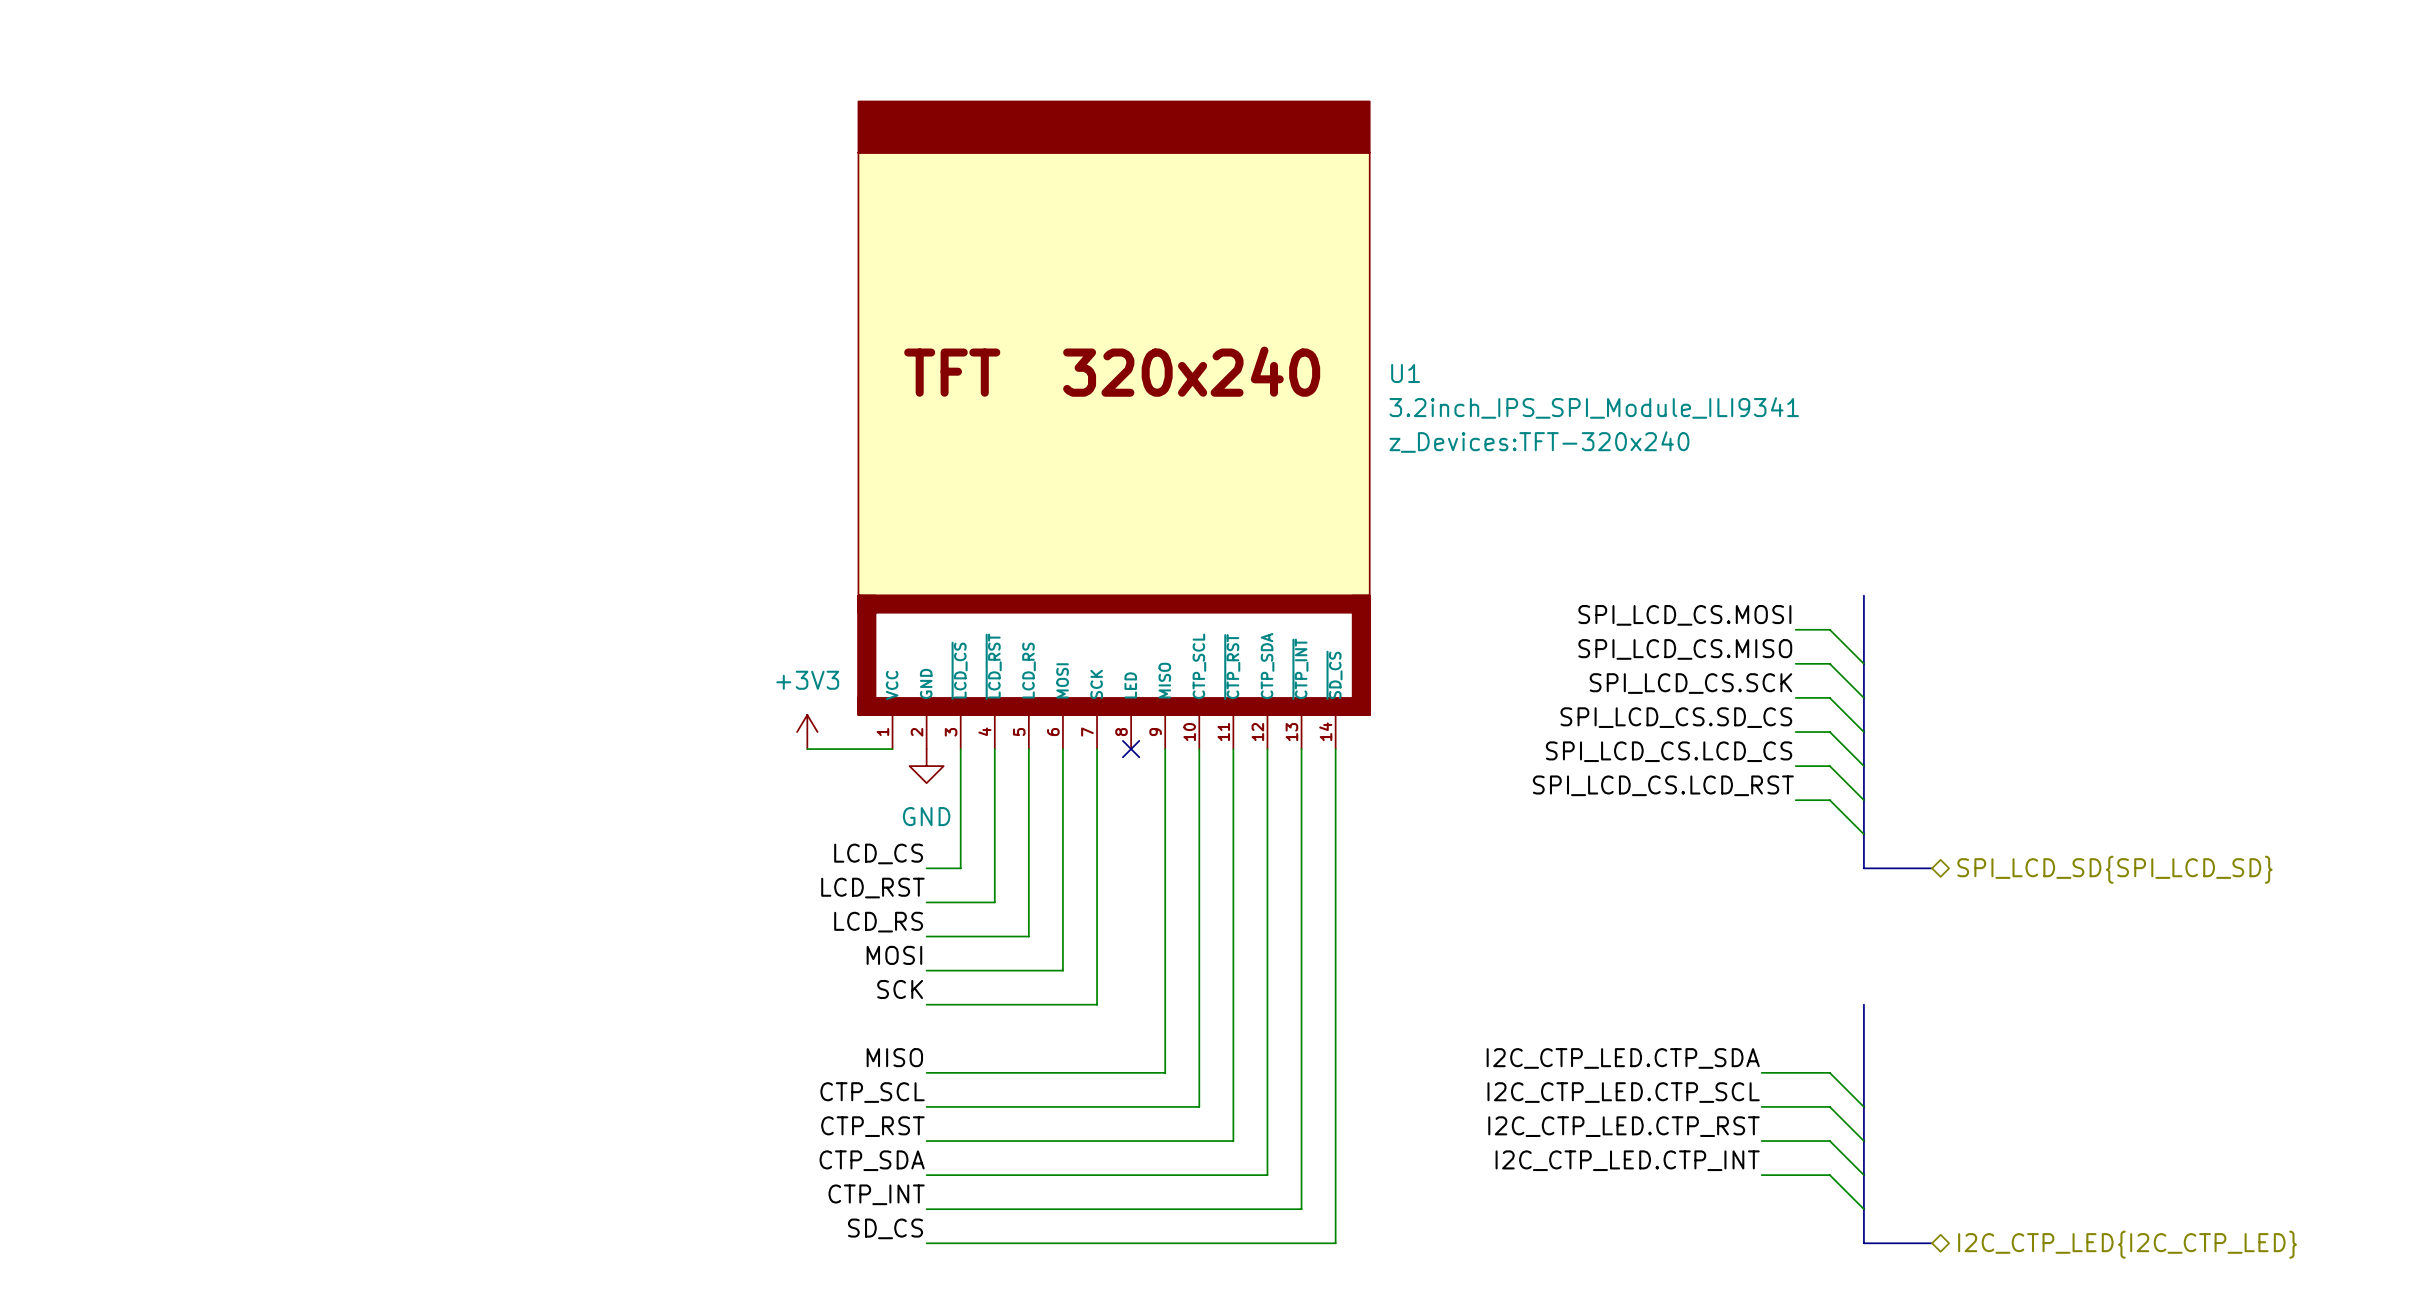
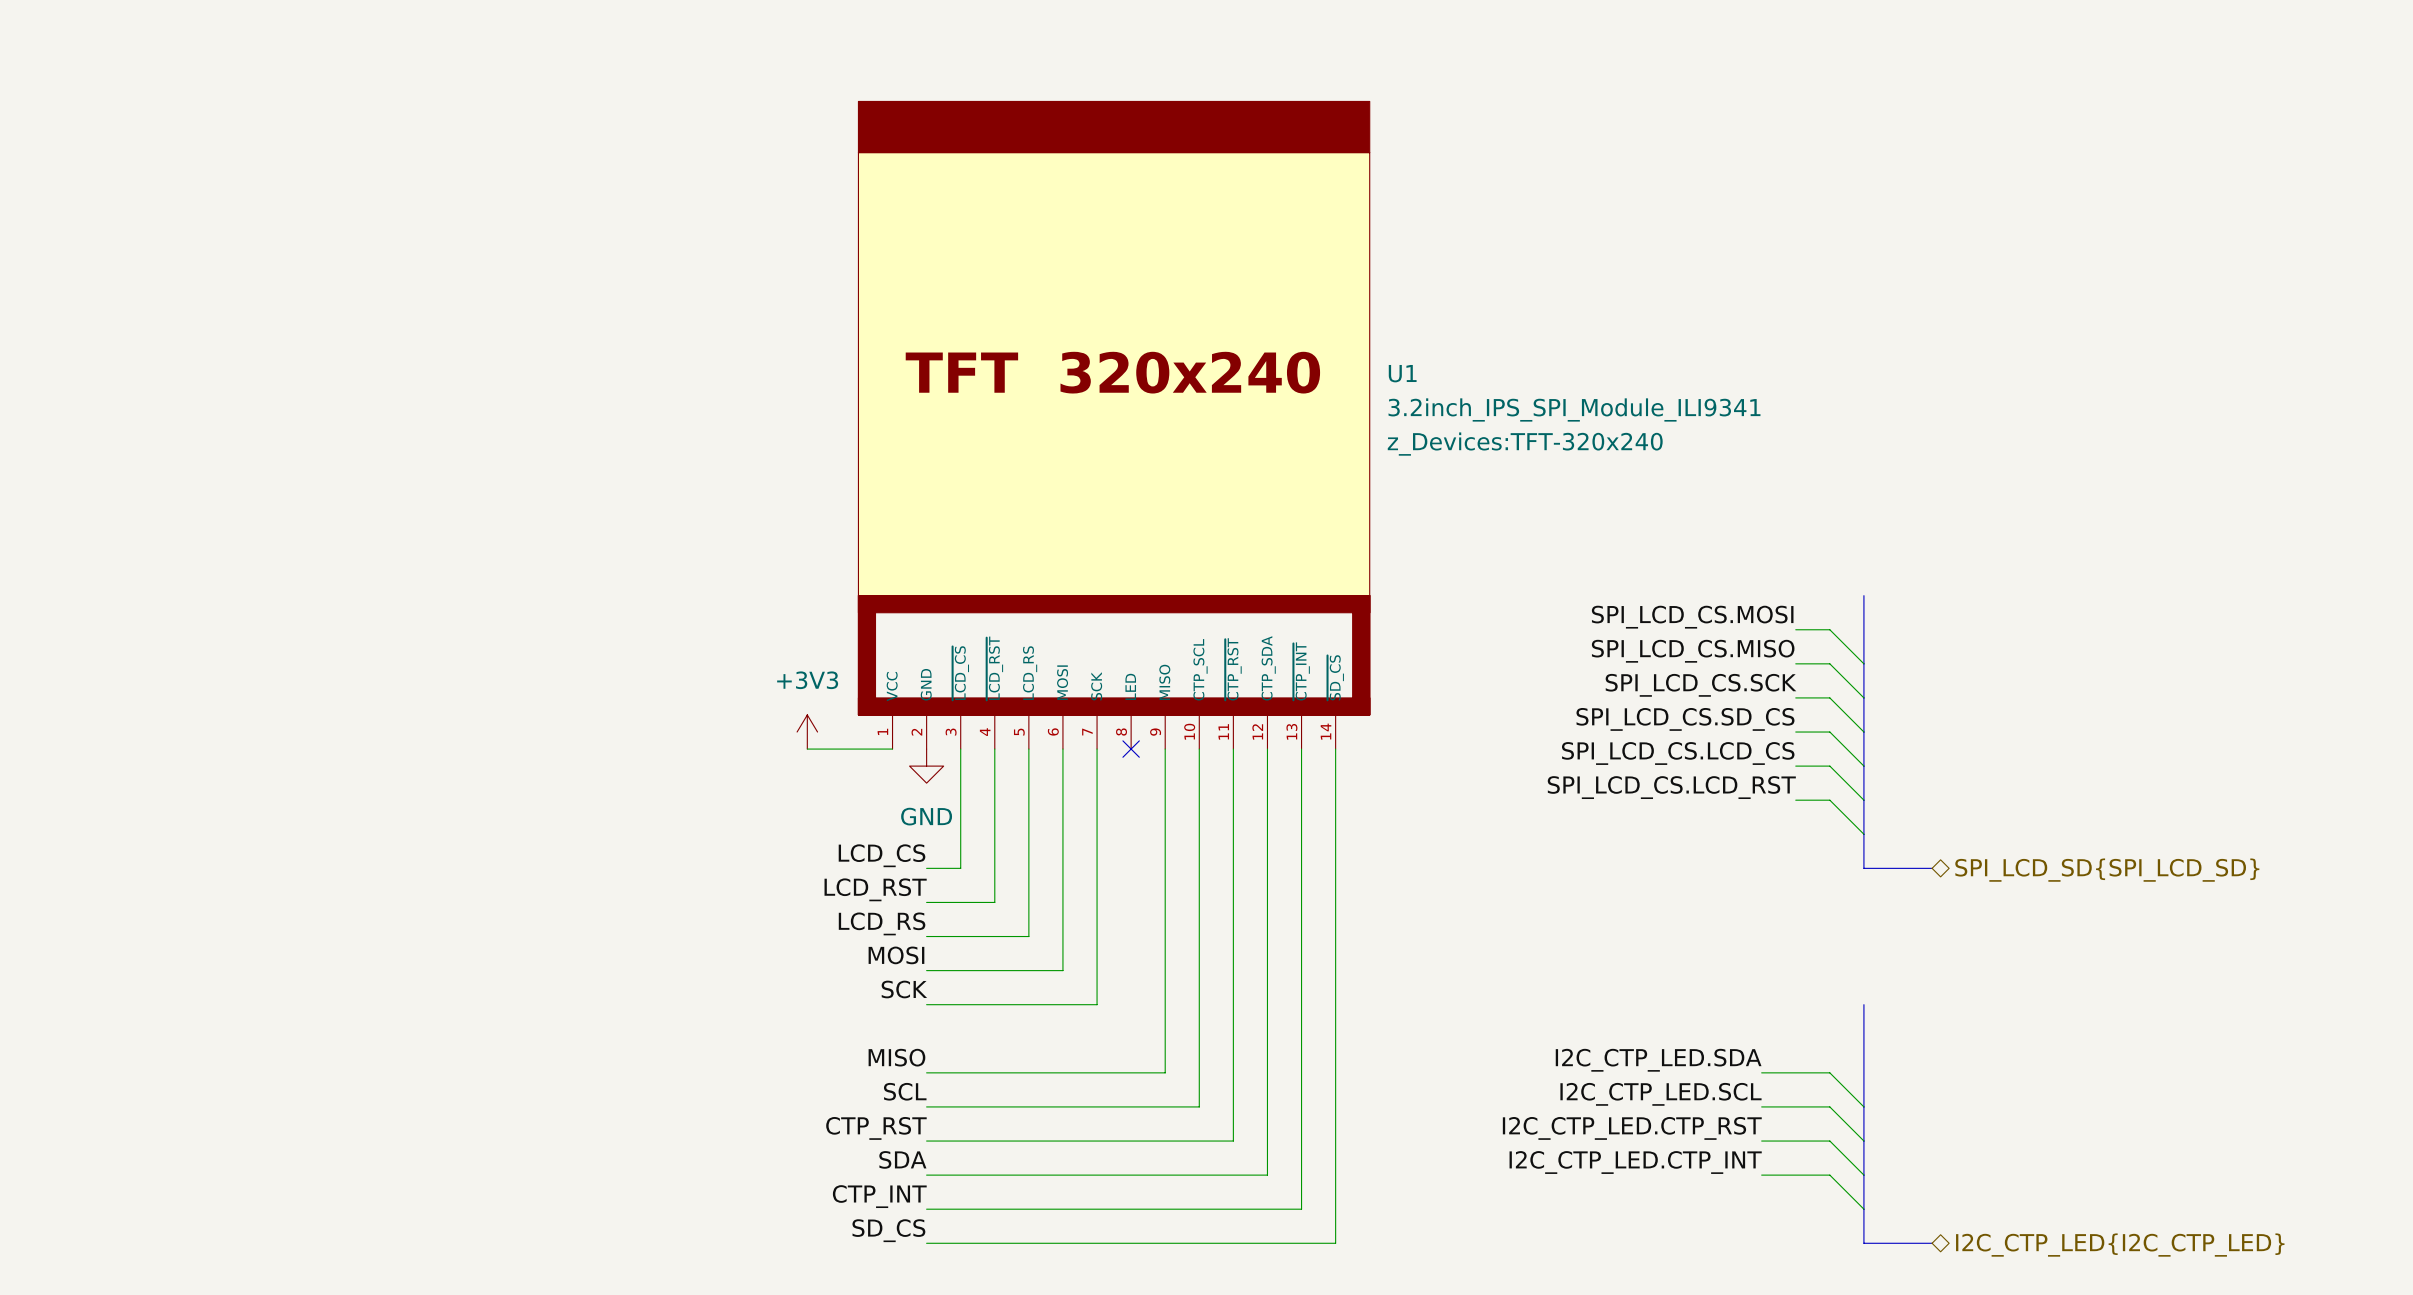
label: I2C_CTP_LED.CTP_SDA (1623, 1058) -> I2C_CTP_LED.SDA (1658, 1060)
label: CTP_SCL (872, 1092) -> SCL (905, 1091)
label: I2C_CTP_LED.CTP_SCL (1623, 1092) -> I2C_CTP_LED.SCL (1660, 1094)
label: CTP_SDA (872, 1160) -> SDA (902, 1159)

